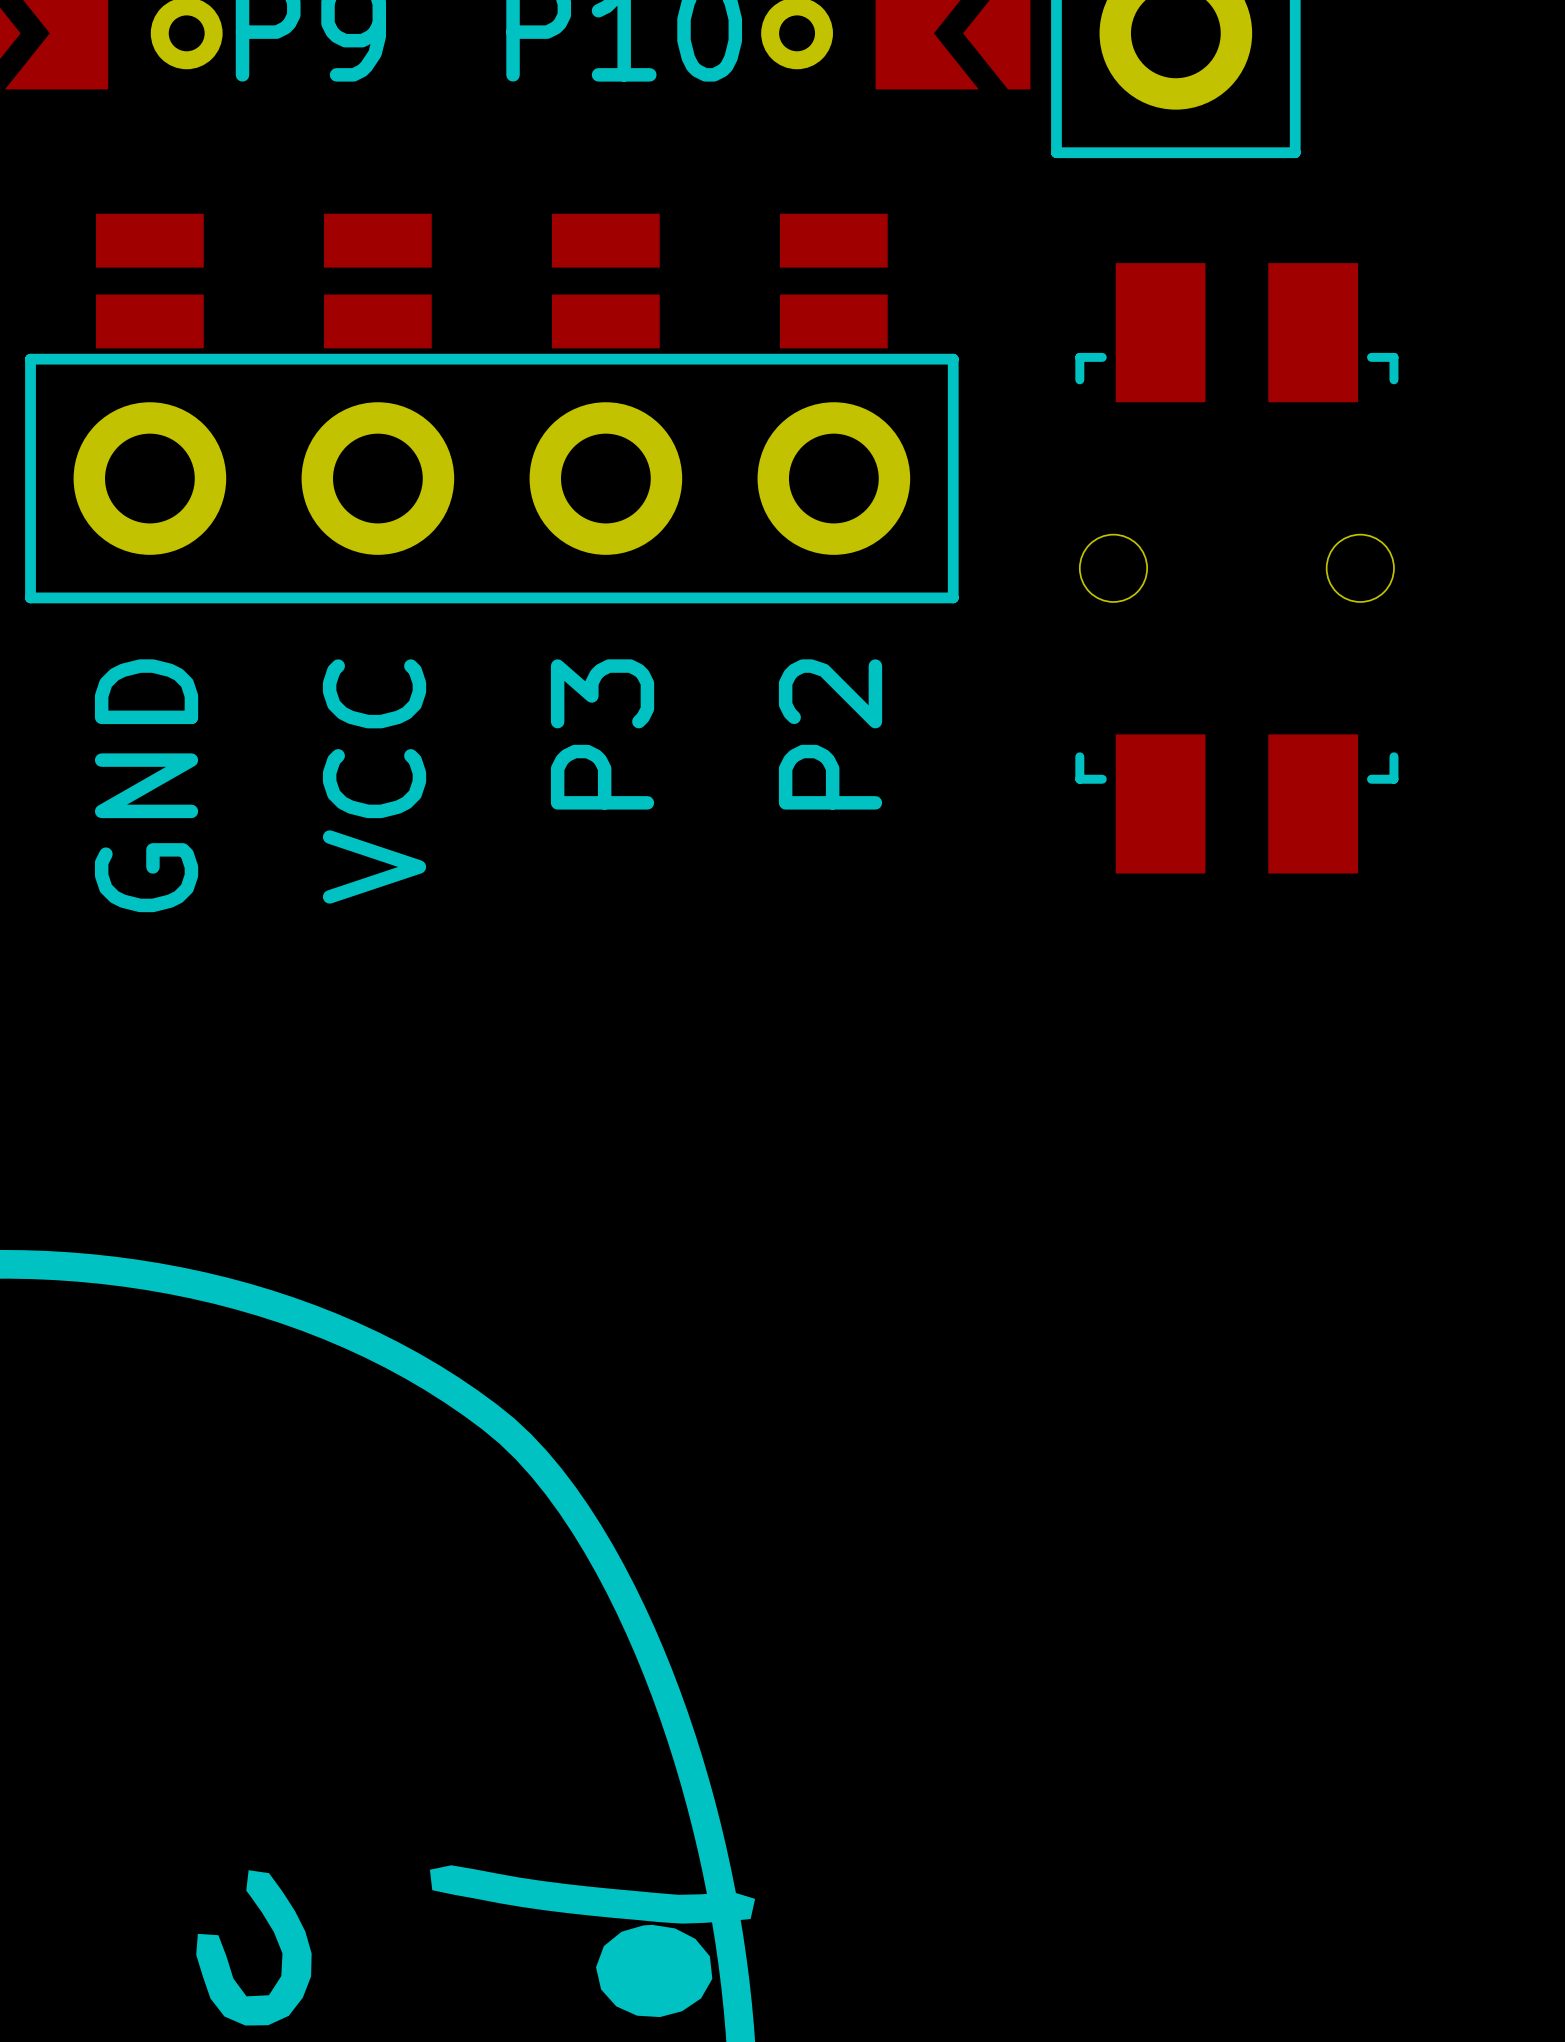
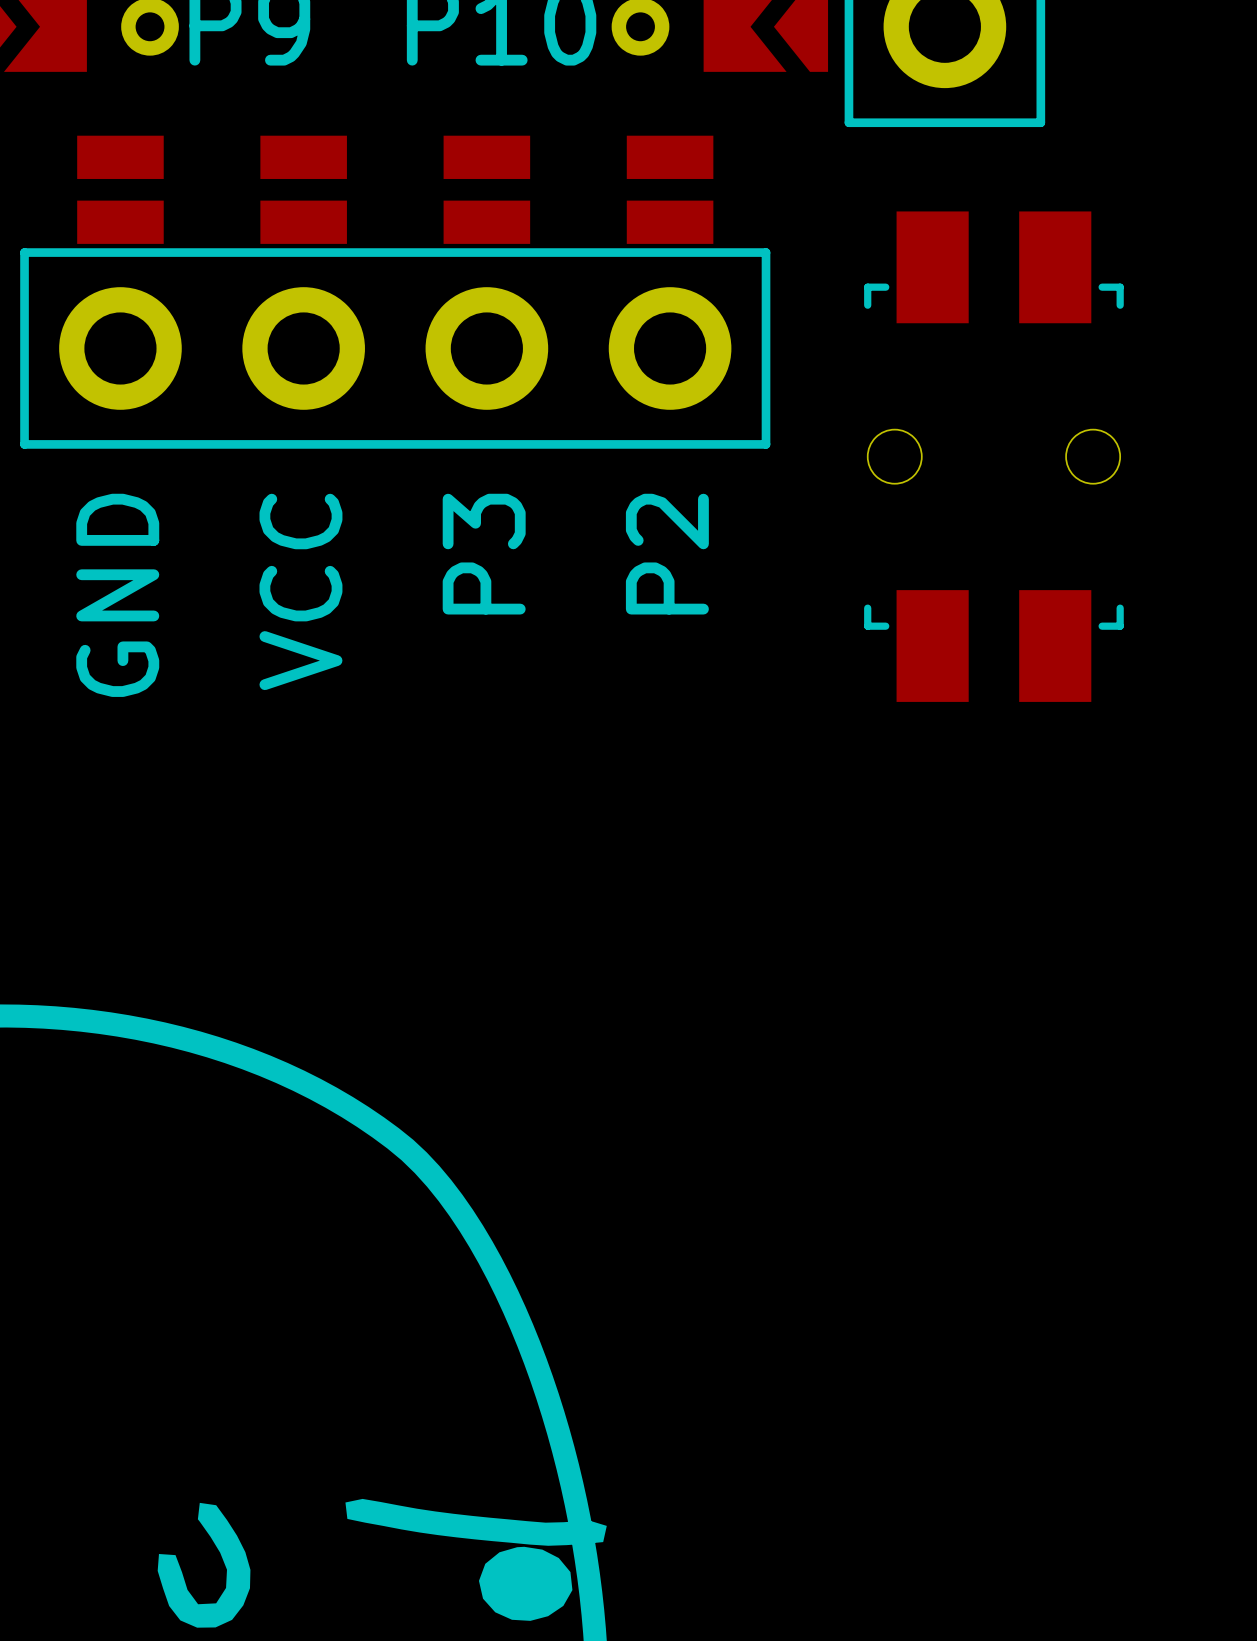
part position: (491, 408) -> (395, 292)

